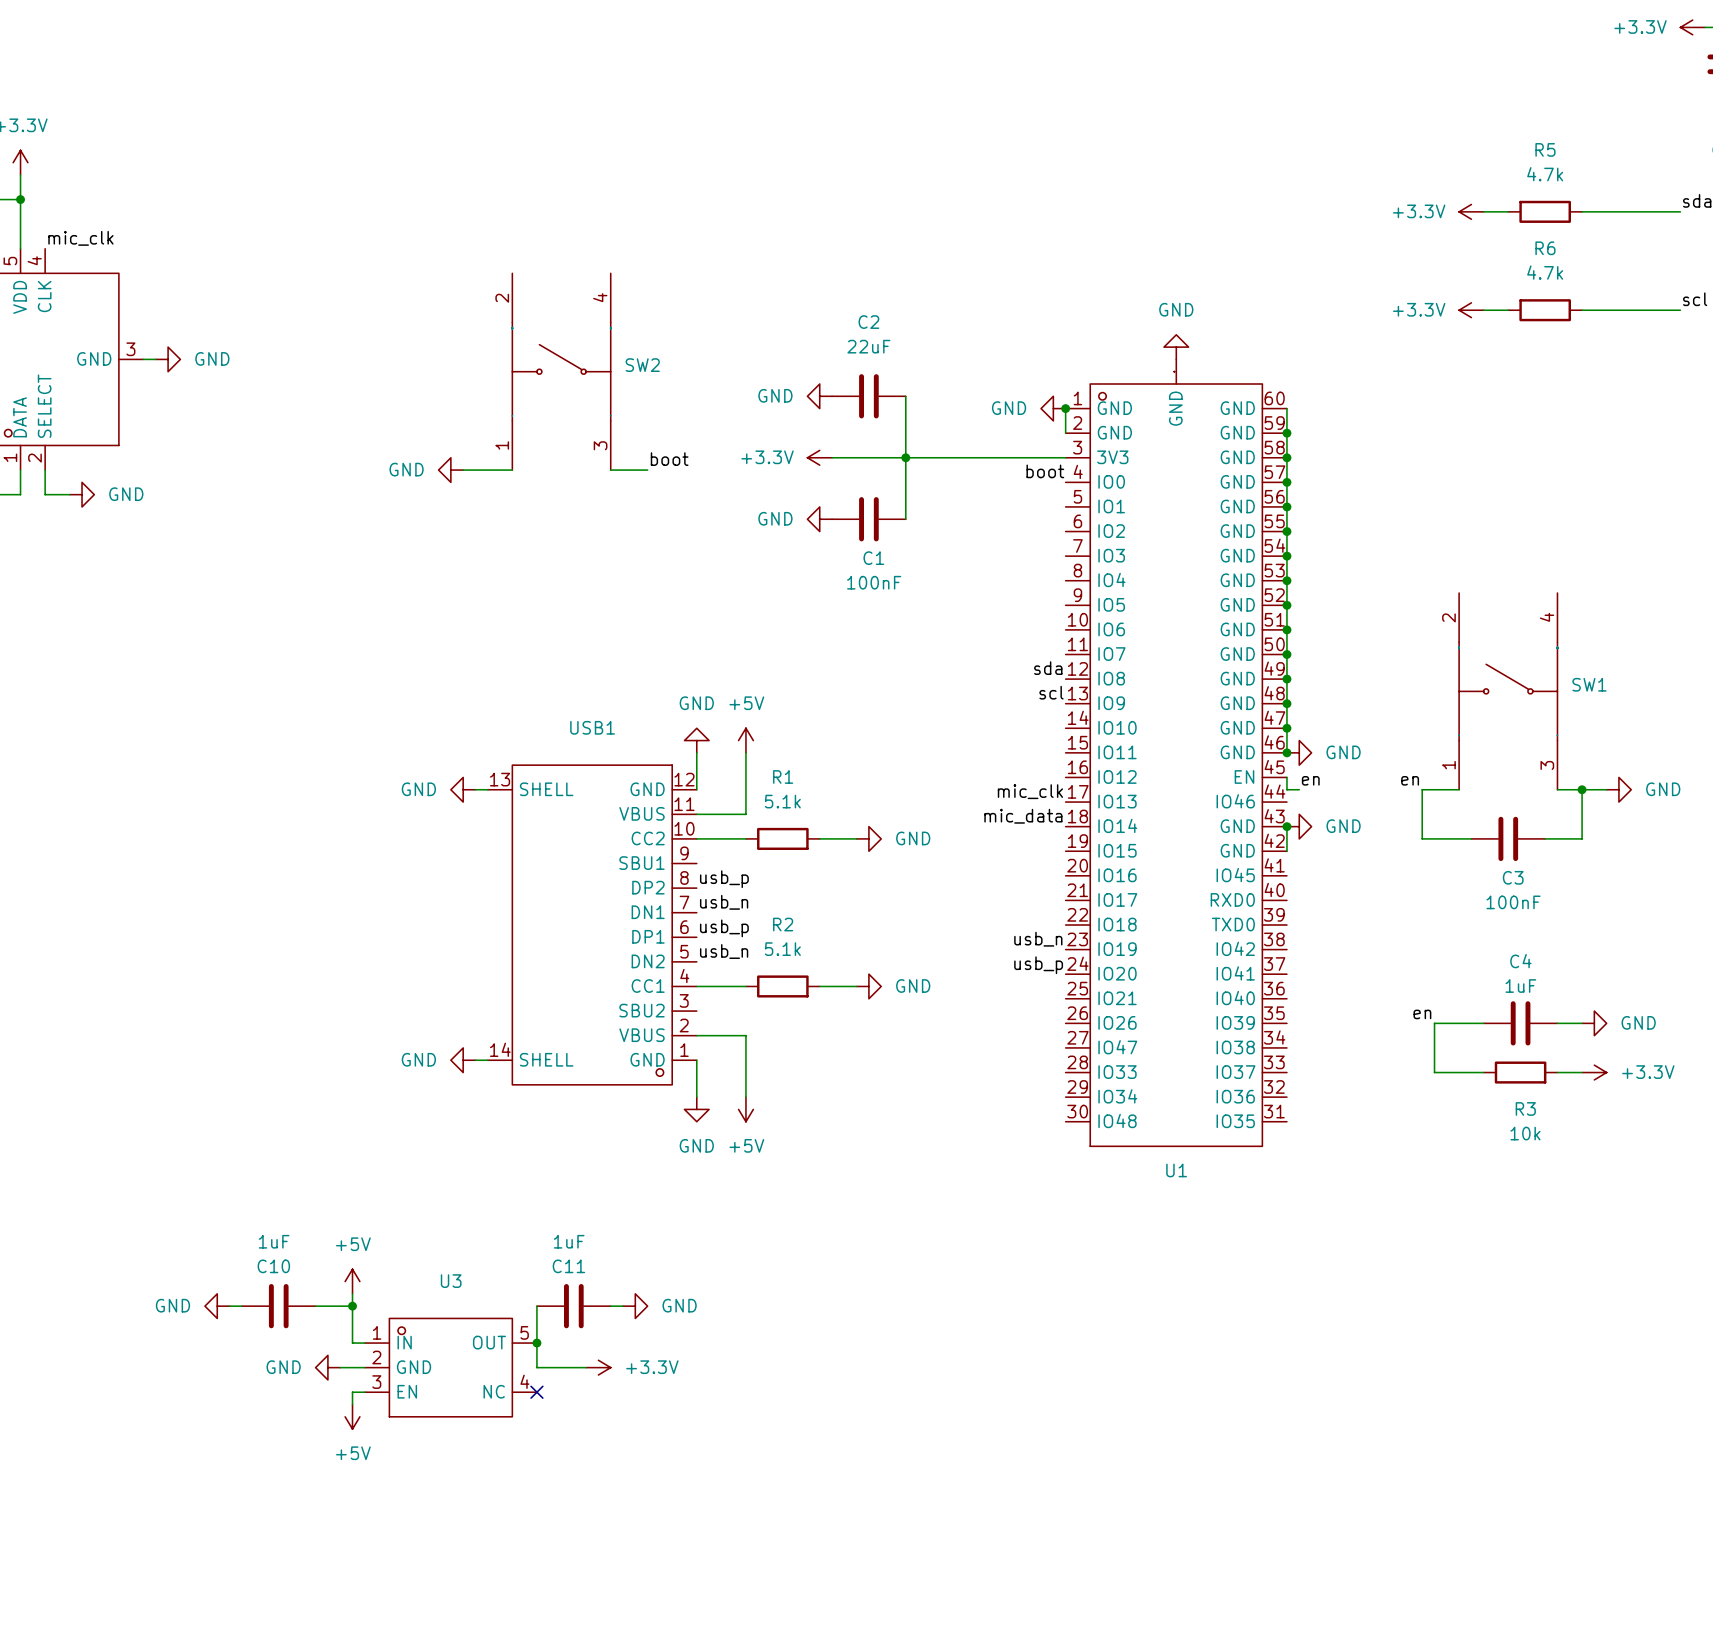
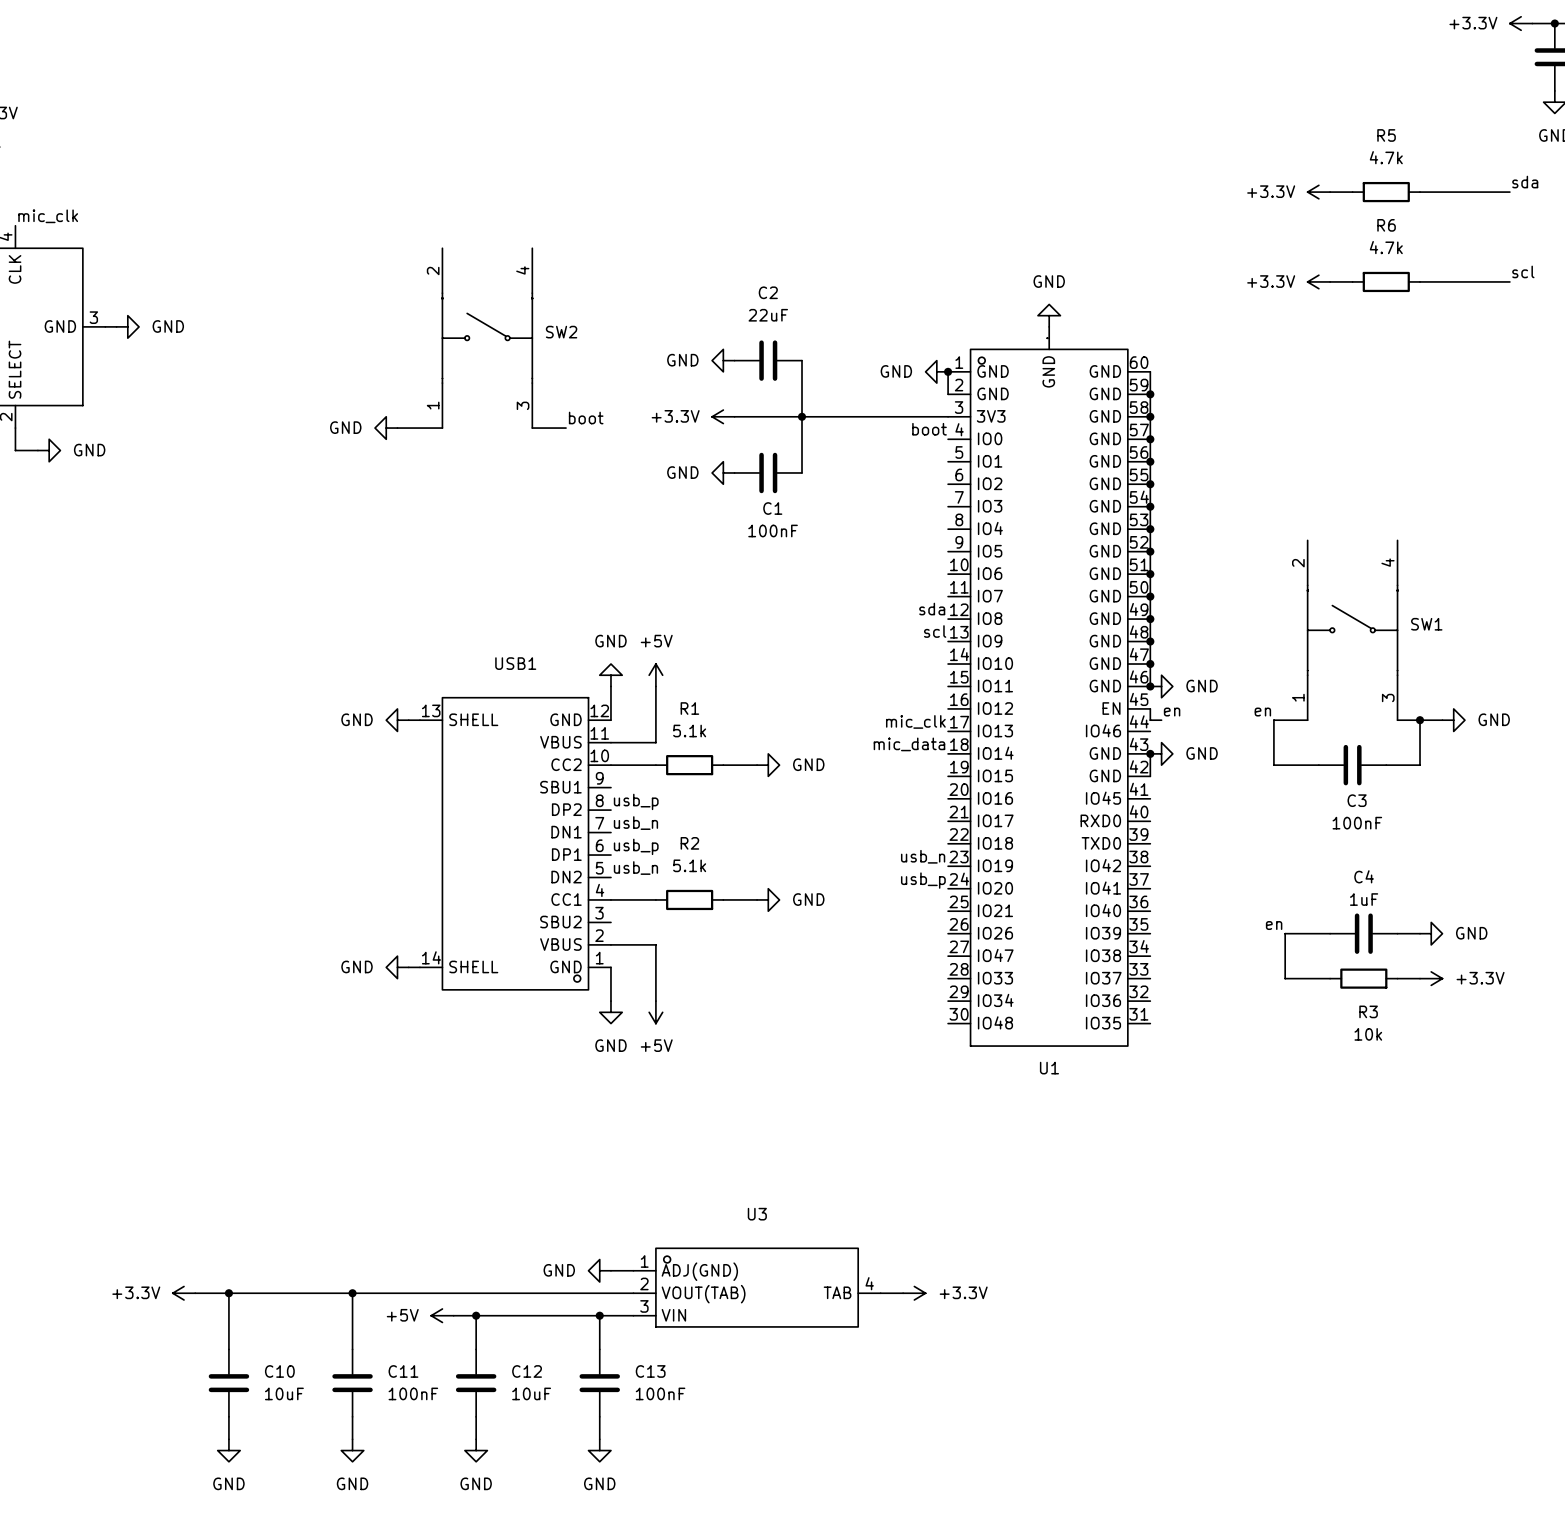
C10 value: 1uF (274, 1241) -> 10uF (284, 1393)
C11 value: 1uF (569, 1241) -> 100nF (413, 1393)
C10 name position: C10 (273, 1266) -> C10 (279, 1371)
C11 name position: C11 (568, 1266) -> C11 (403, 1371)
power symbol: +5V (352, 1281) -> none
wire: (352, 1293) (352, 1343) (364, 1343) -> none
power symbol: GND (217, 1306) -> none
wire: (229, 1306) (241, 1306) -> none
C10 rotation: 0° (278, 1306) -> 90° clockwise (228, 1383)
C10 position: (278, 1306) -> (228, 1383)
wire: (315, 1306) (352, 1306) -> none
junction: (352, 1306) -> none
wire: (536, 1306) (536, 1367) (586, 1367) -> none
C11 rotation: 0° (573, 1306) -> 90° clockwise (352, 1383)
C11 position: (573, 1306) -> (352, 1383)
wire: (610, 1306) (623, 1306) -> none
power symbol rotation: 0° (635, 1306) -> 180° (599, 1270)
power symbol position: GND (635, 1306) -> GND (599, 1270)
U3 symbol: [364, 1318, 537, 1417] -> [633, 1248, 881, 1327]
junction: (536, 1343) -> none
power symbol: GND (327, 1367) -> none
wire: (340, 1367) (364, 1367) -> none
power symbol: +3.3V (598, 1367) -> none
wire: (364, 1392) (352, 1392) (352, 1404) -> none
no-connect mark: (536, 1392) -> none
wire: none -> (610, 1270) (633, 1270)
power symbol: none -> +3.3V (184, 1293)
wire: none -> (195, 1293) (633, 1293)
wire: none -> (228, 1293) (228, 1349)
junction: none -> (228, 1293)
power symbol: +5V (352, 1416) -> none
wire: none -> (352, 1293) (352, 1349)
junction: none -> (352, 1293)
wire: none -> (880, 1293) (903, 1293)
power symbol: none -> +3.3V (914, 1293)
power symbol: none -> +5V (442, 1315)
wire: none -> (453, 1315) (633, 1315)
wire: none -> (476, 1315) (476, 1349)
junction: none -> (476, 1315)
wire: none -> (599, 1315) (599, 1349)
junction: none -> (599, 1315)
C12: none -> 10uF (476, 1383)
C13: none -> 100nF (599, 1383)
wire: none -> (228, 1416) (228, 1439)
wire: none -> (352, 1416) (352, 1439)
wire: none -> (476, 1416) (476, 1439)
wire: none -> (599, 1416) (599, 1439)
power symbol: none -> GND (228, 1450)
power symbol: none -> GND (352, 1450)
power symbol: none -> GND (476, 1450)
power symbol: none -> GND (599, 1450)

